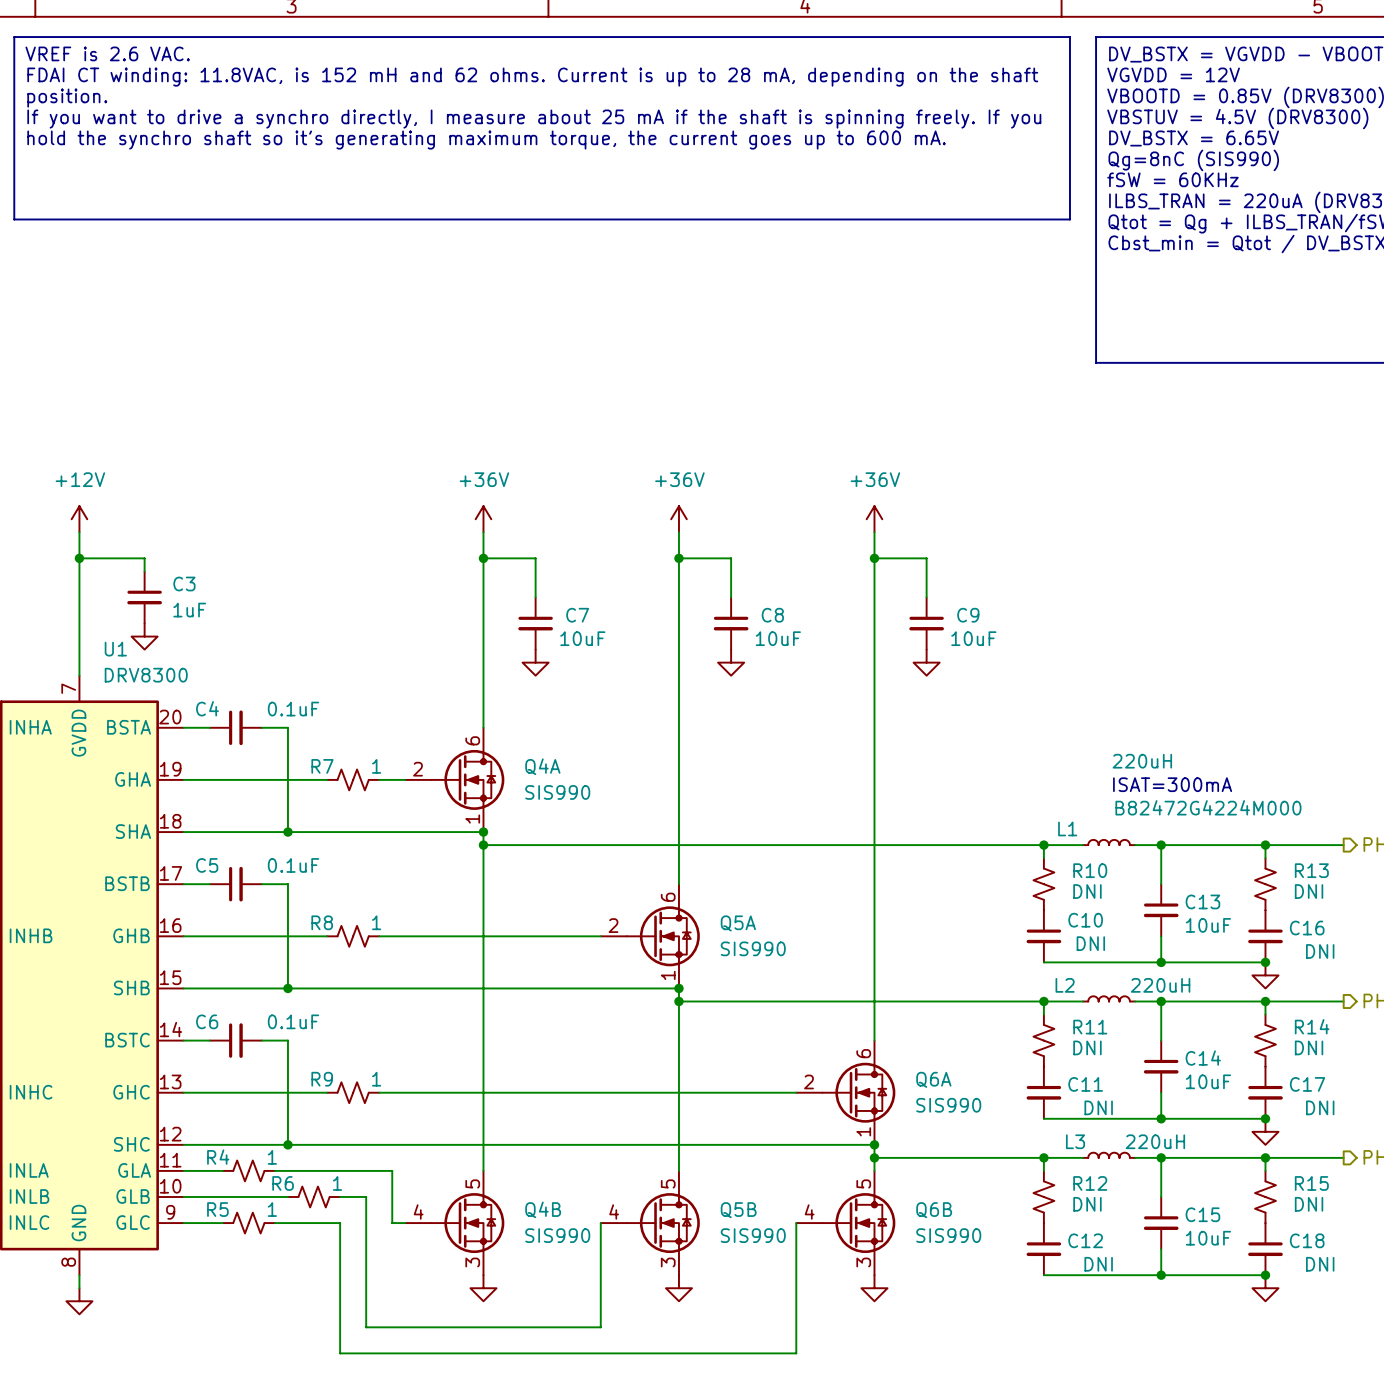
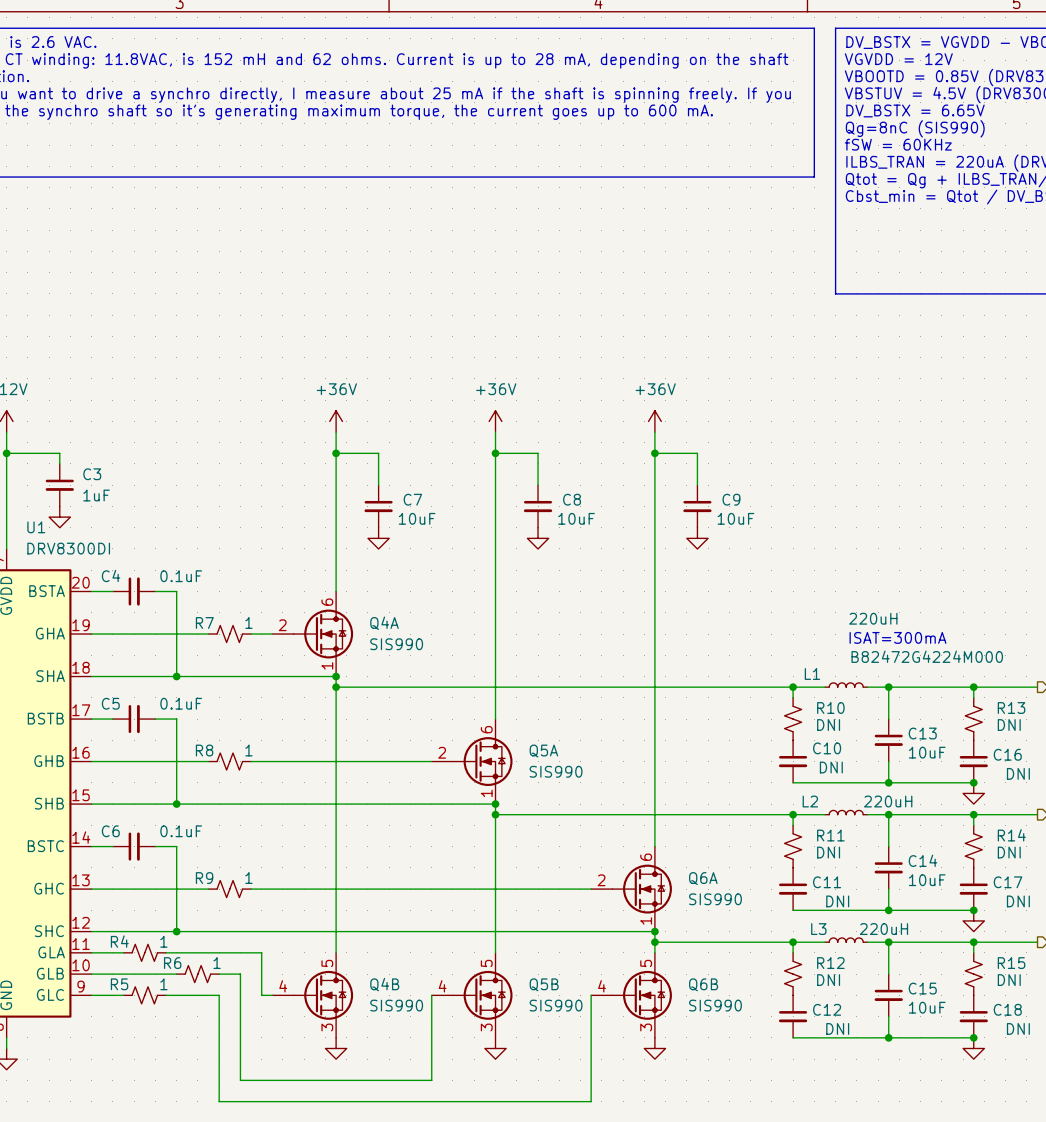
U1 value: DRV8300 (146, 675) -> DRV8300DI (68, 548)

